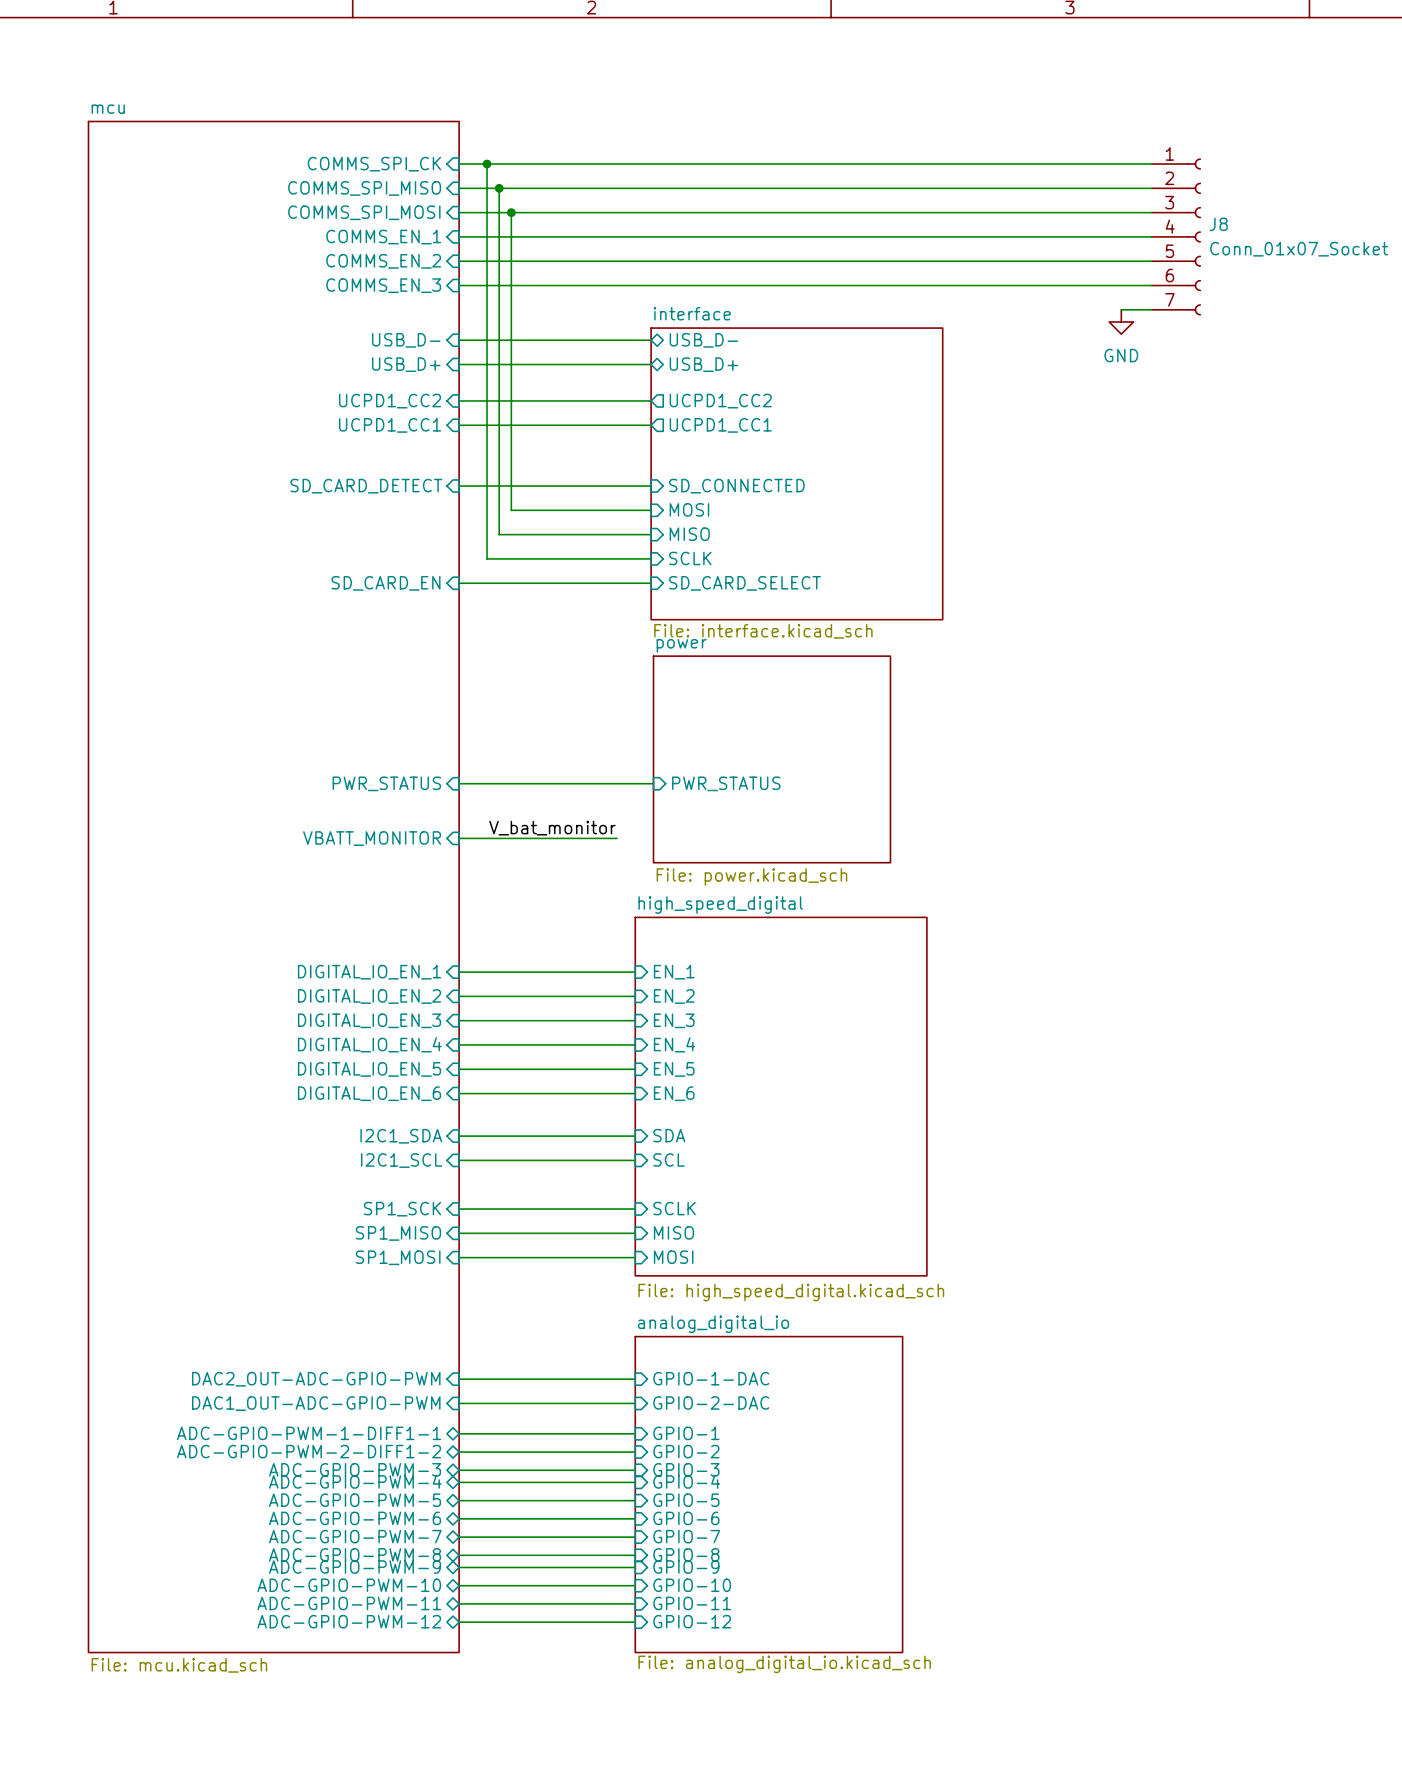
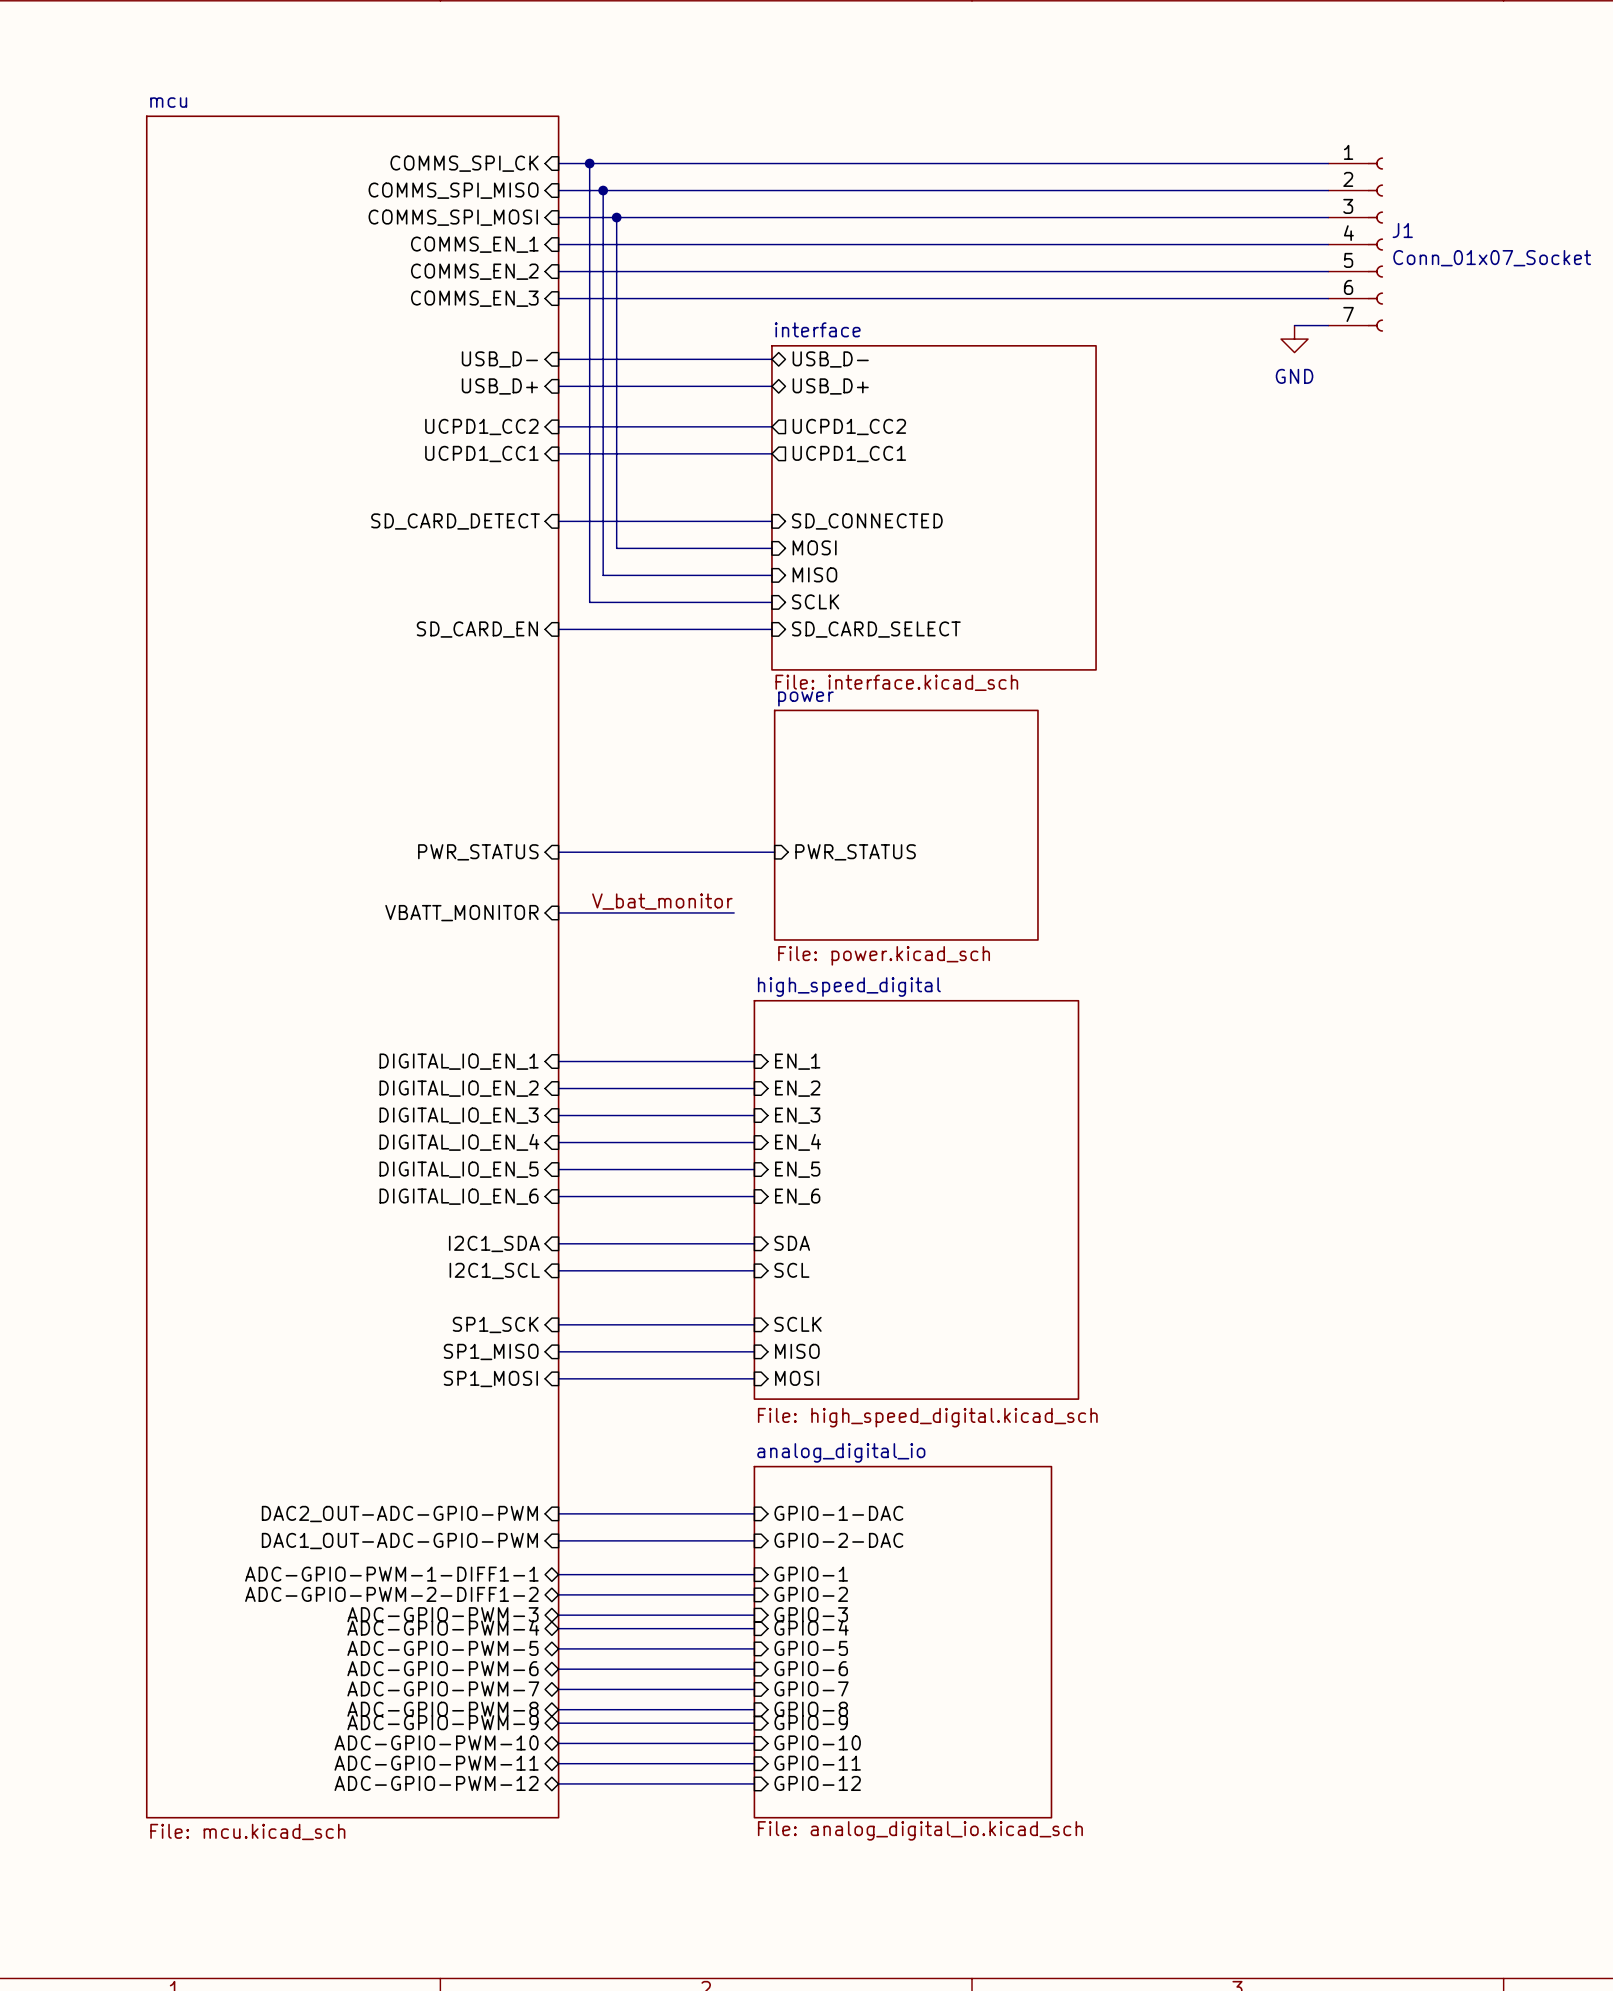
J8 name: J8 (1218, 224) -> J1 (1402, 230)

